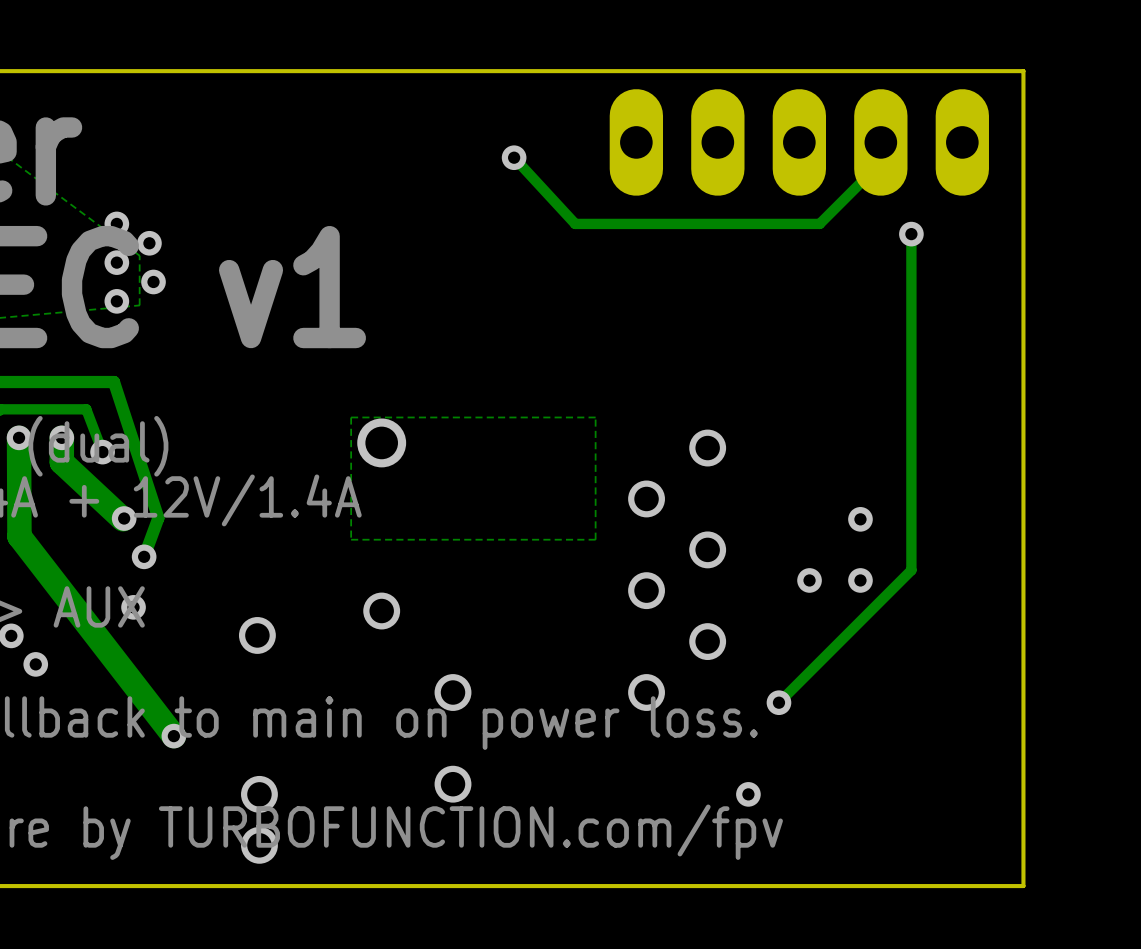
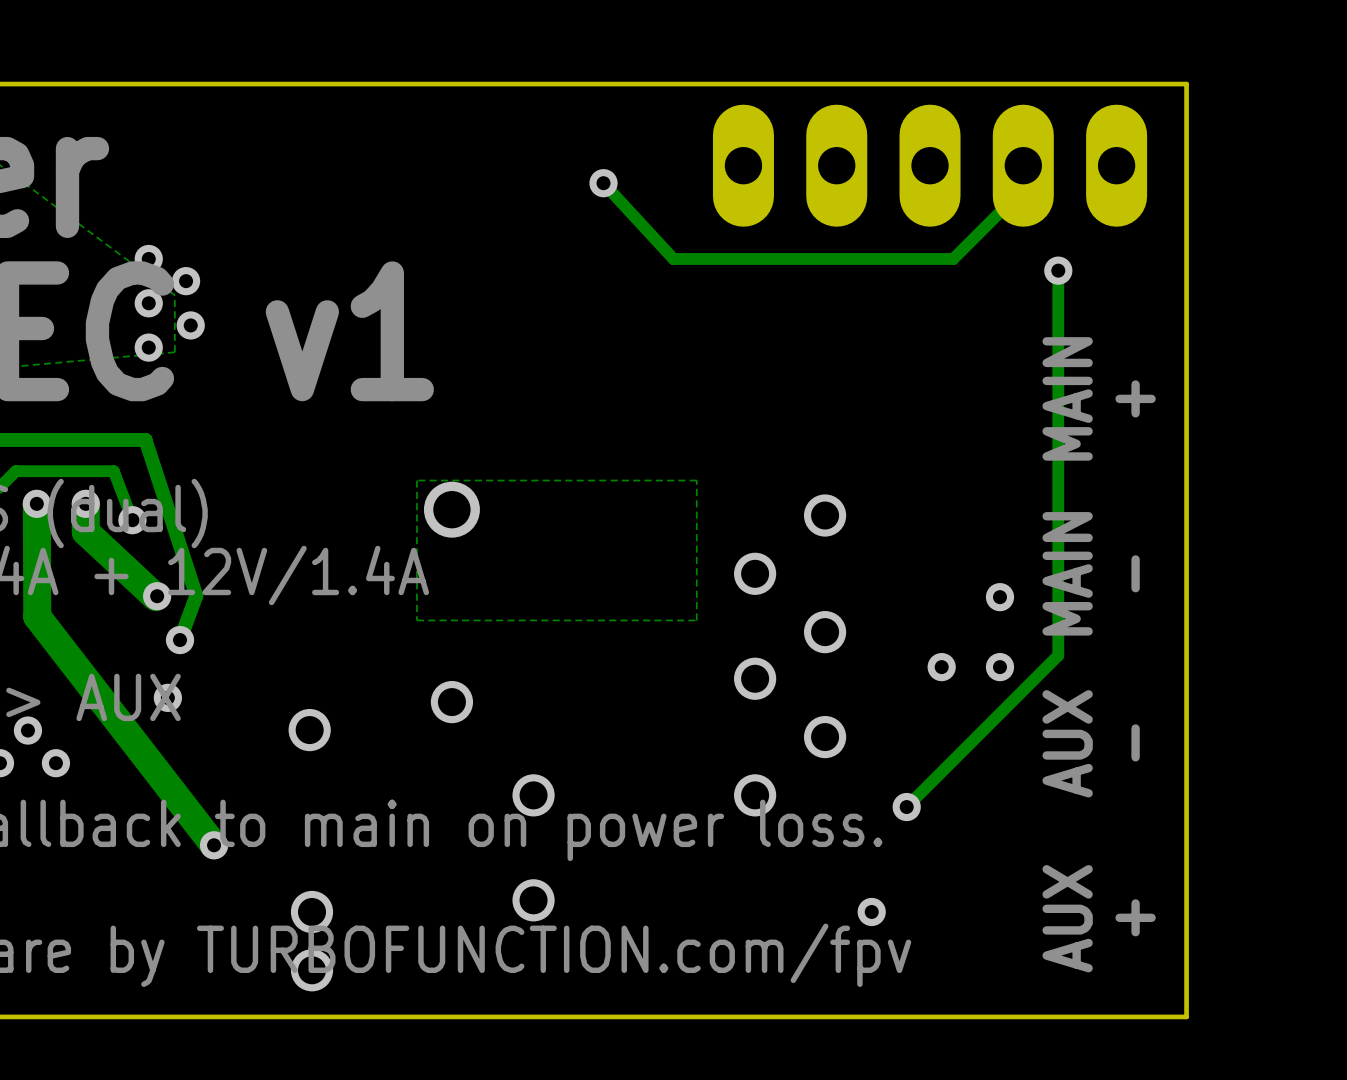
text: none -> MAIN (1067, 398)
text: none -> + (1135, 398)
text: none -> MAIN (1067, 573)
text: none -> - (1135, 573)
text: none -> - (1135, 742)
text: none -> AUX (1067, 743)
text: none -> + (1135, 917)
text: none -> AUX (1067, 918)

